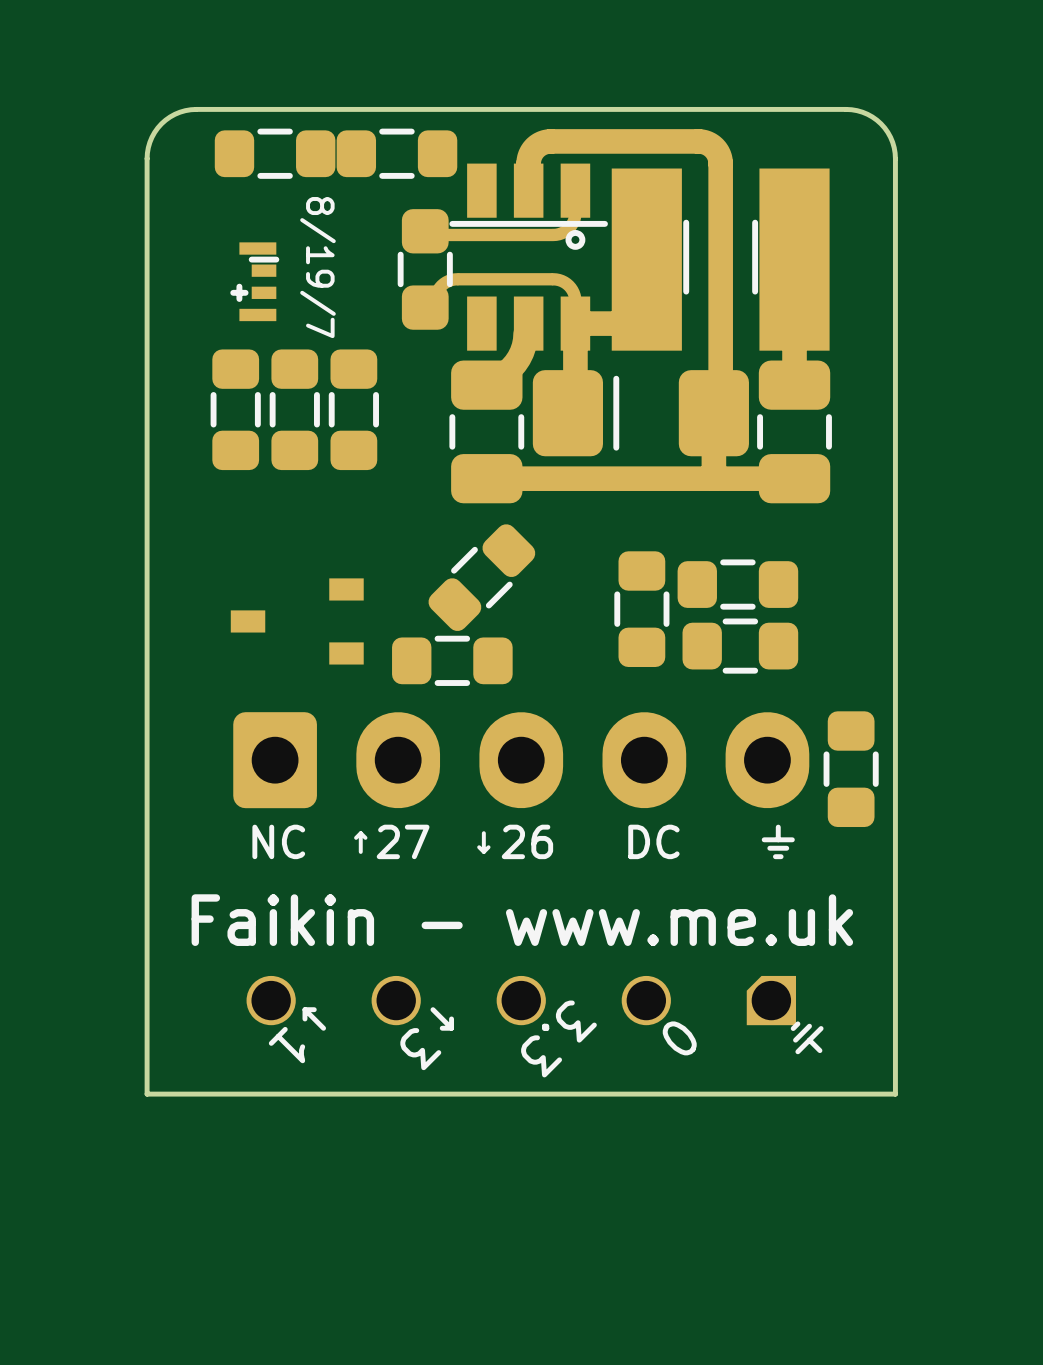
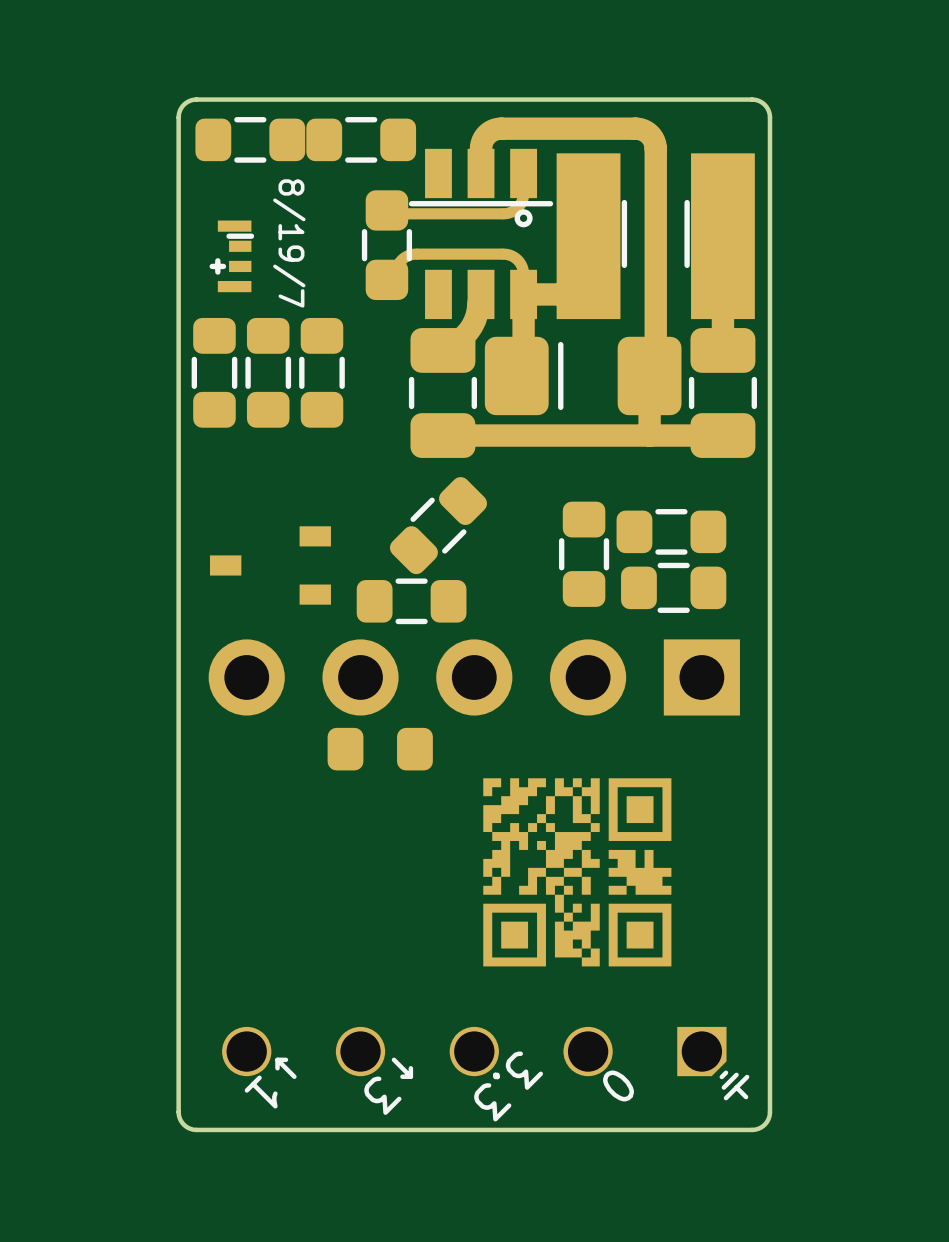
board edge: (826, 109) (851, 109) (872, 116) (887, 132) (895, 153) (895, 1094) (147, 1094) (147, 153) (154, 132) (170, 116) (190, 109) (216, 109) -> (752, 99) (764, 104) (769, 117) (769, 1112) (764, 1124) (752, 1129) (196, 1129) (187, 1127) (180, 1119) (178, 1112) (178, 117) (183, 104) (196, 99)
part footprint: [233, 712, 810, 809] -> [208, 639, 740, 716]
part: (851, 769) -> none
part: none -> (380, 749)
text: NC (278, 841) -> none
text: 27 (403, 841) -> none
text: 26 (527, 841) -> none
text: DC (653, 841) -> none
text: ⏚ (778, 841) -> none
text: ↑ (360, 842) -> none
text: ↓ (483, 842) -> none
text: Faikin - www.me.uk (522, 920) -> none
part: none -> (577, 872)
part: (521, 1000) -> none
part: none -> (474, 1051)

